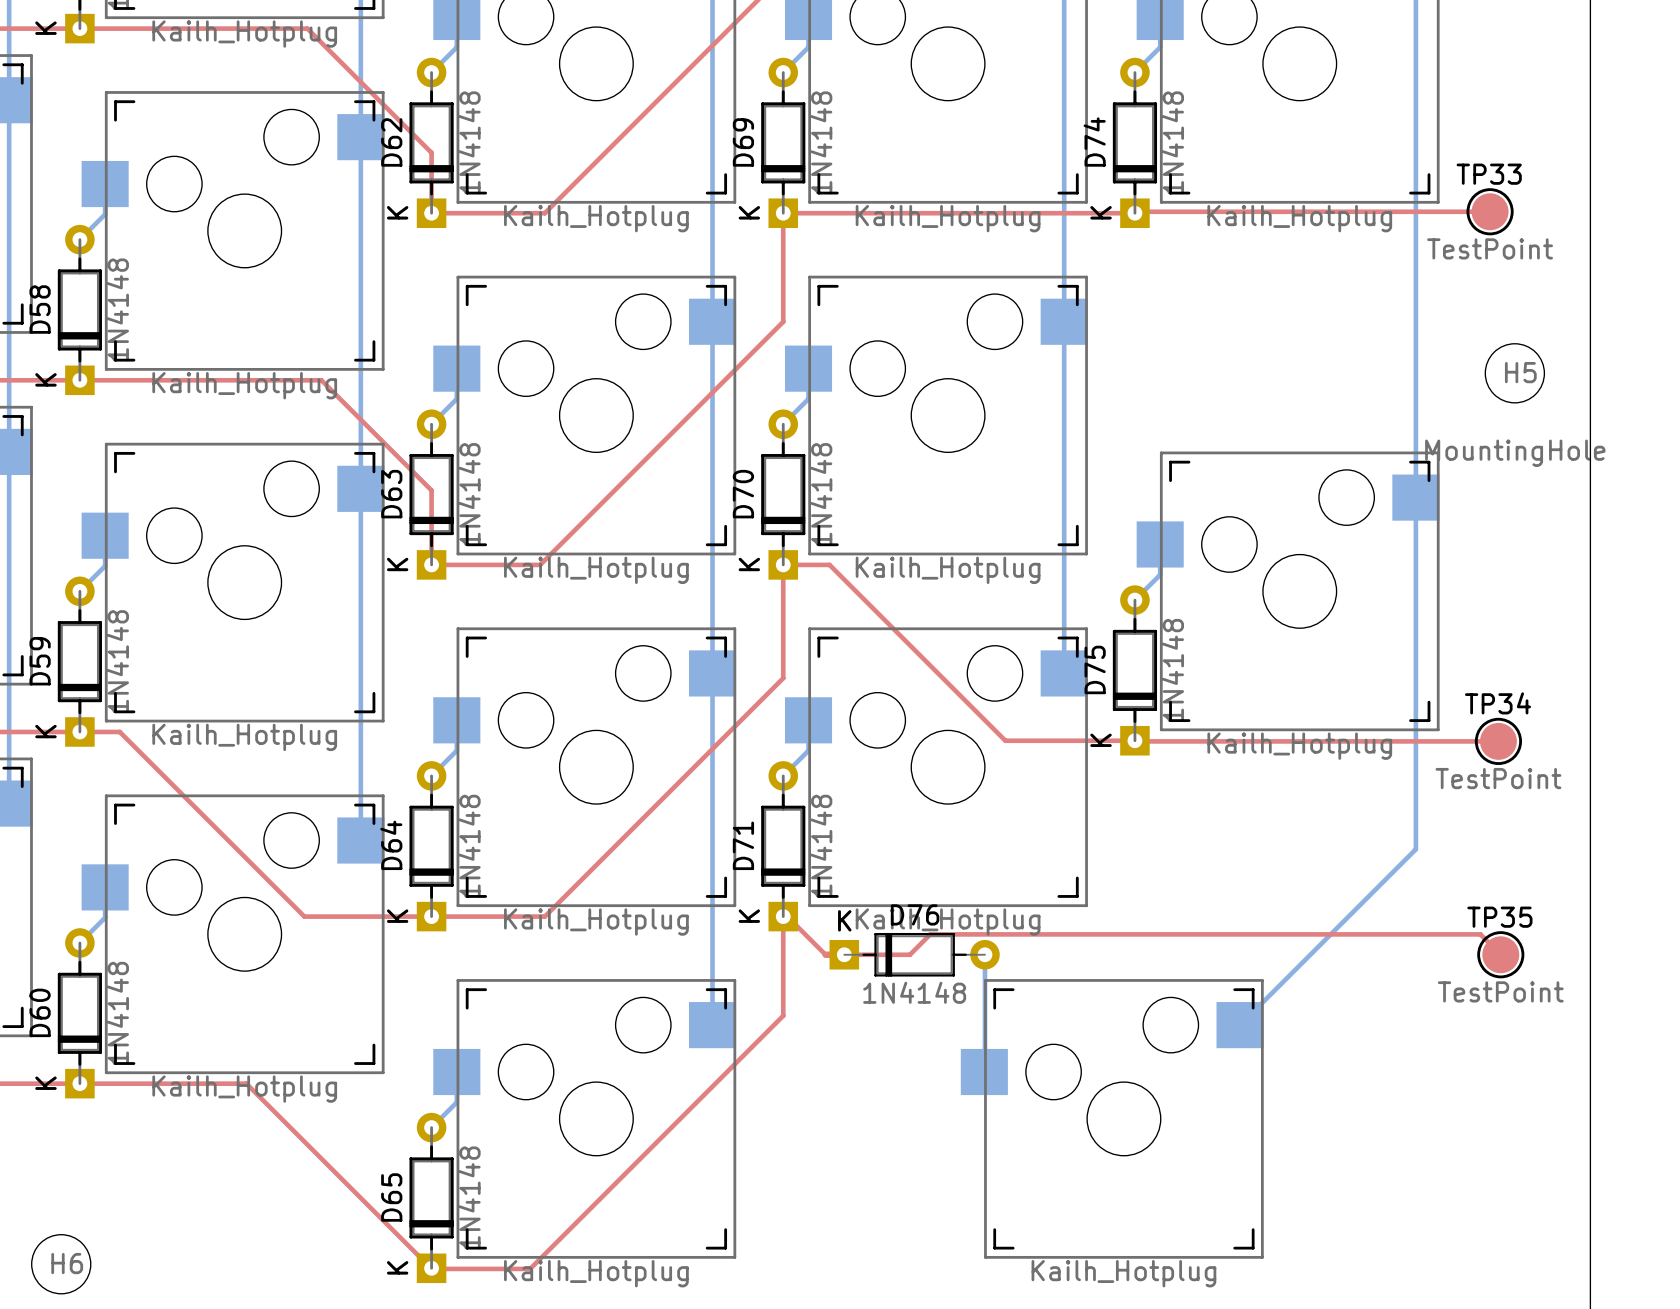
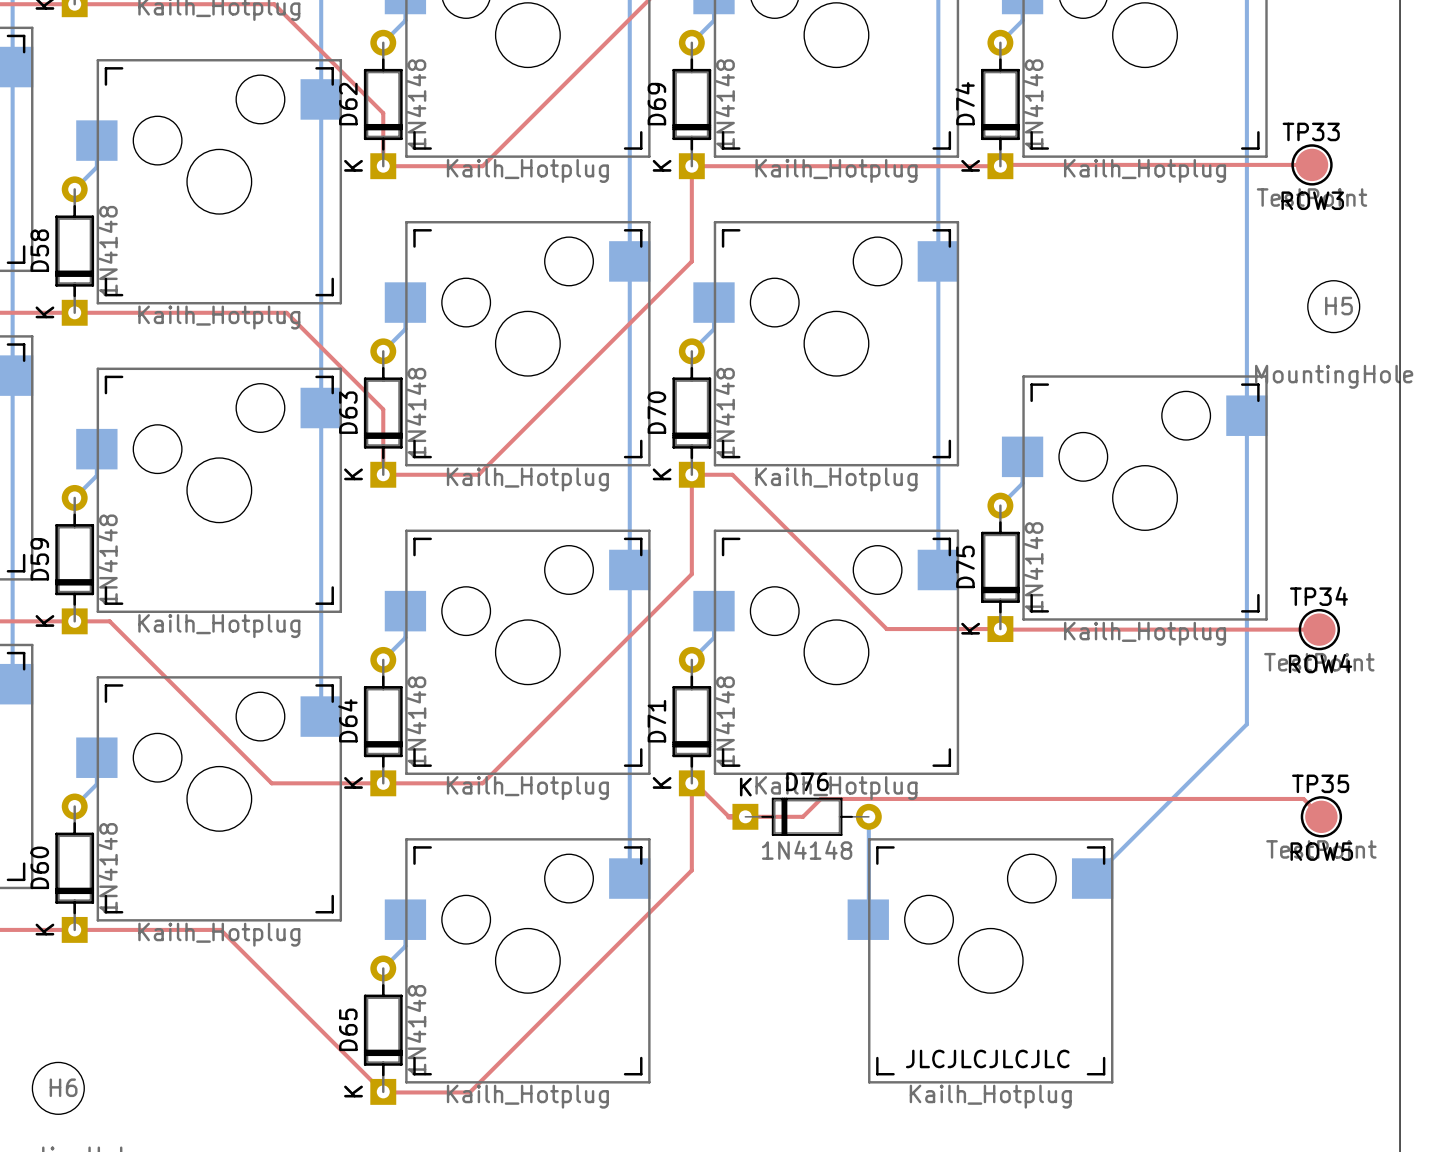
text: none -> ROW3 (1312, 200)
text: none -> ROW4 (1320, 663)
text: none -> ROW5 (1321, 851)
text: none -> JLCJLCJLCJLC (987, 1058)

